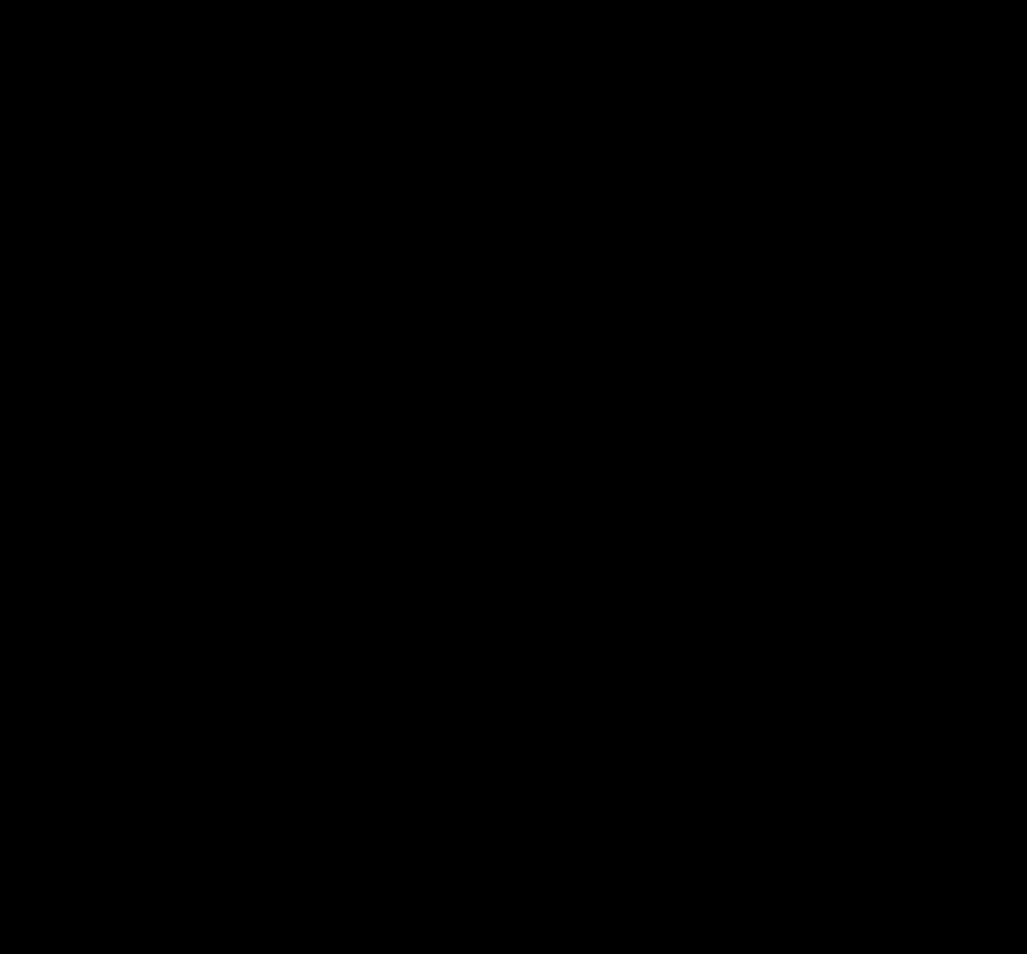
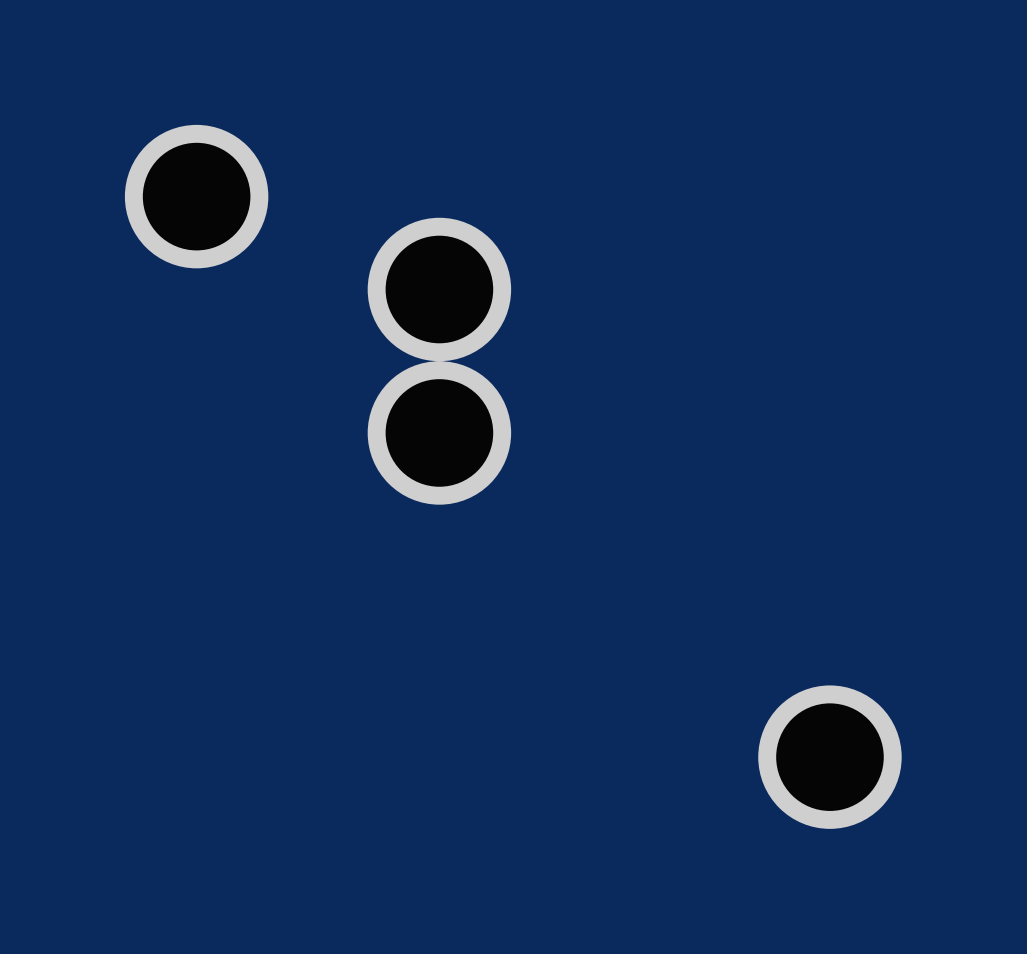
part: none -> (196, 196)
part: none -> (439, 289)
part: none -> (439, 432)
part: none -> (829, 757)

